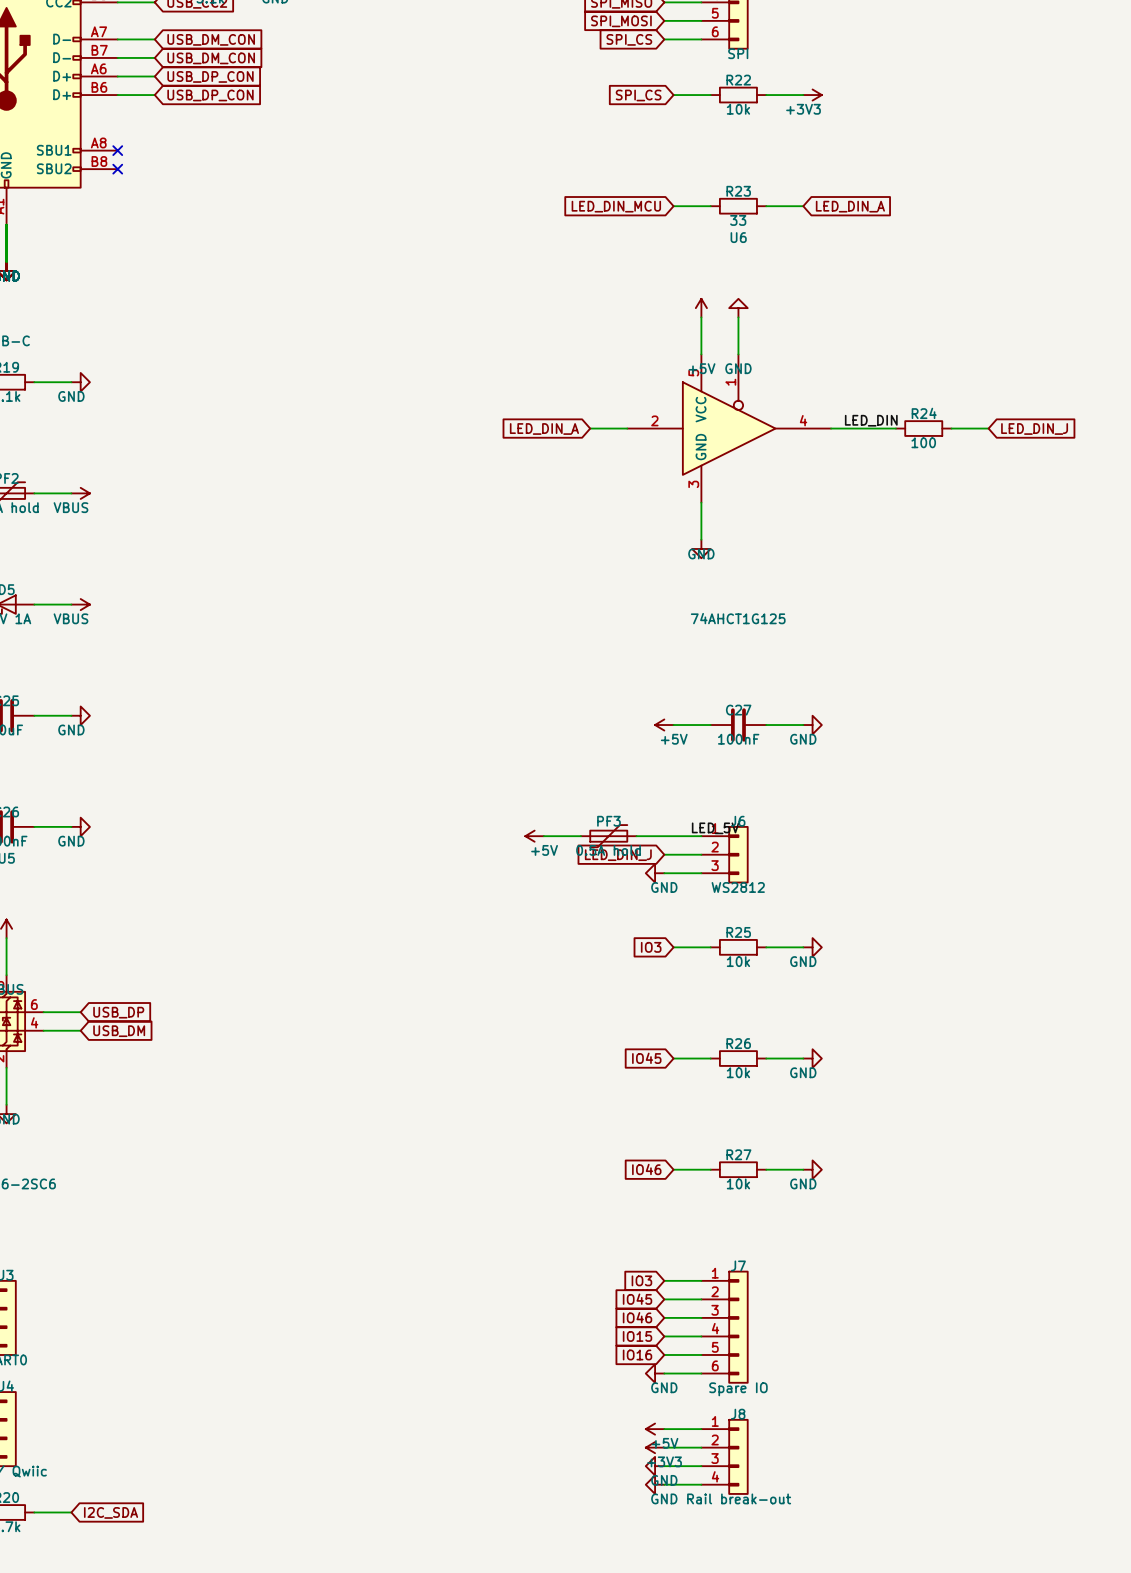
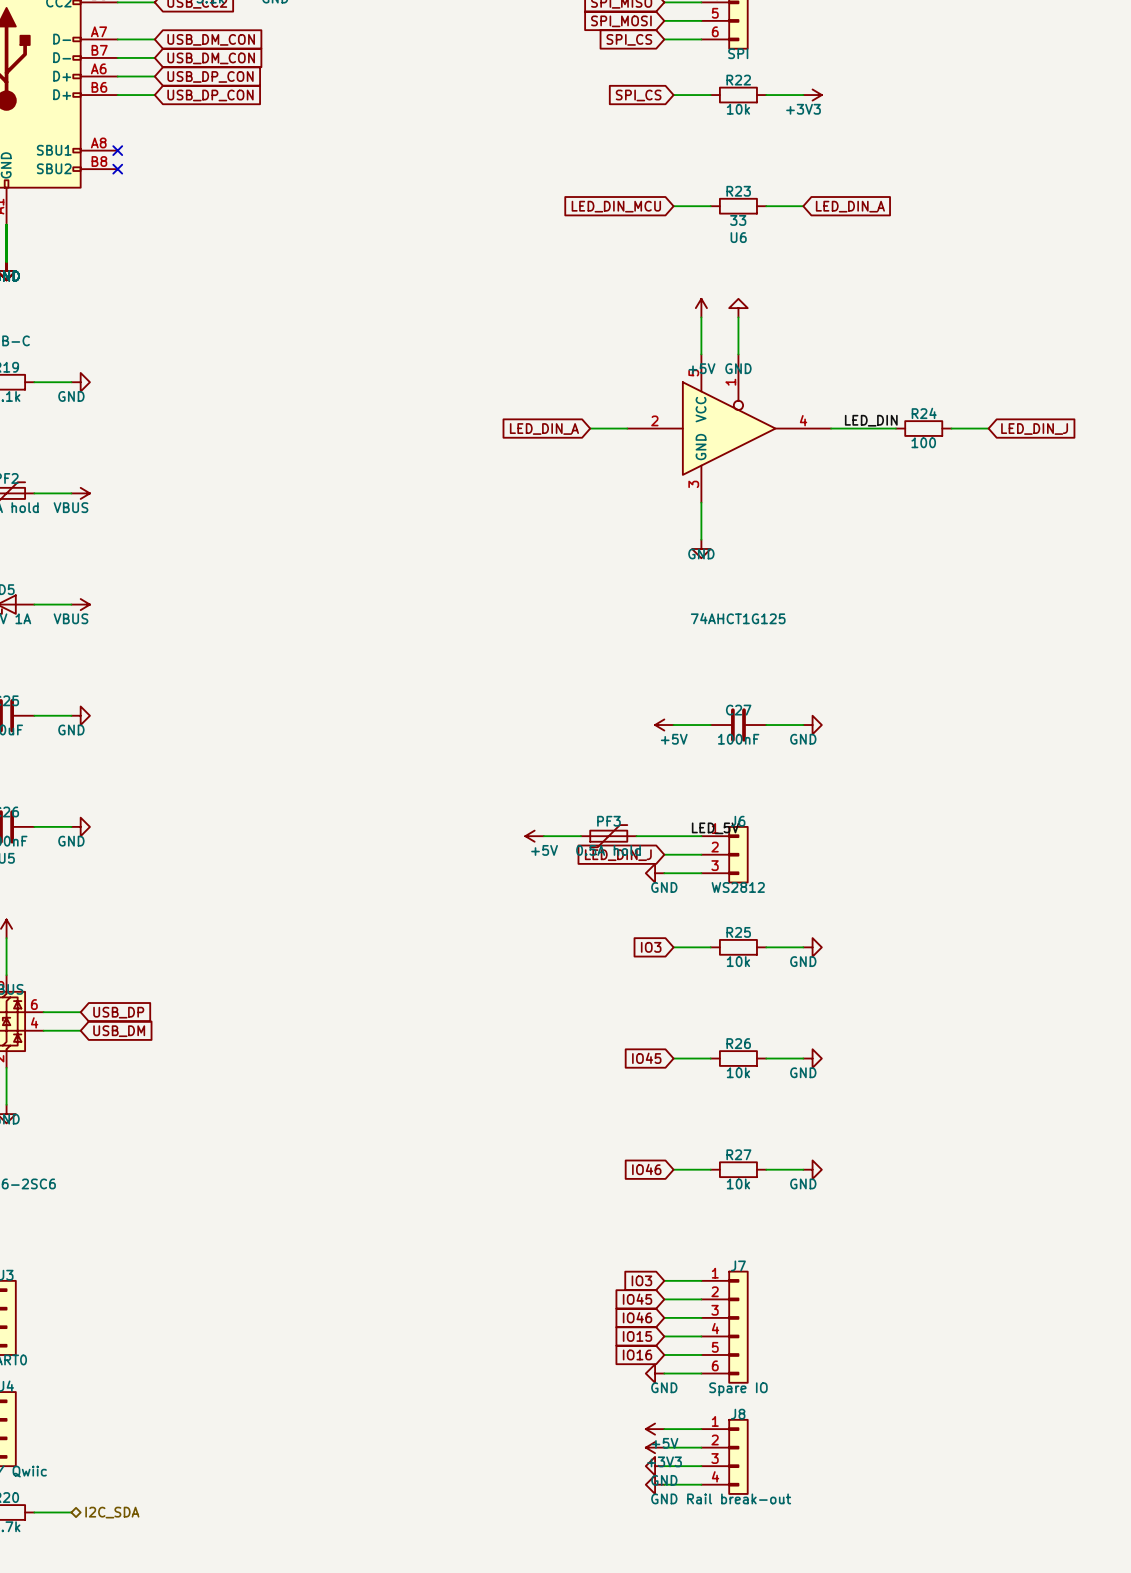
global label: I2C_SDA (111, 1512) -> none
hierarchical label: none -> I2C_SDA (112, 1512)

